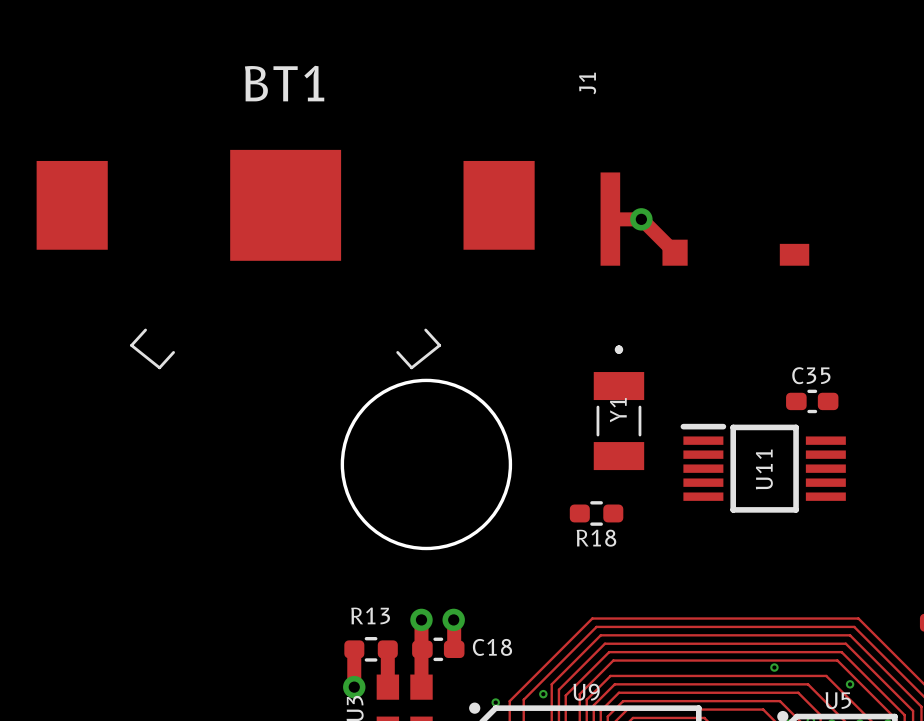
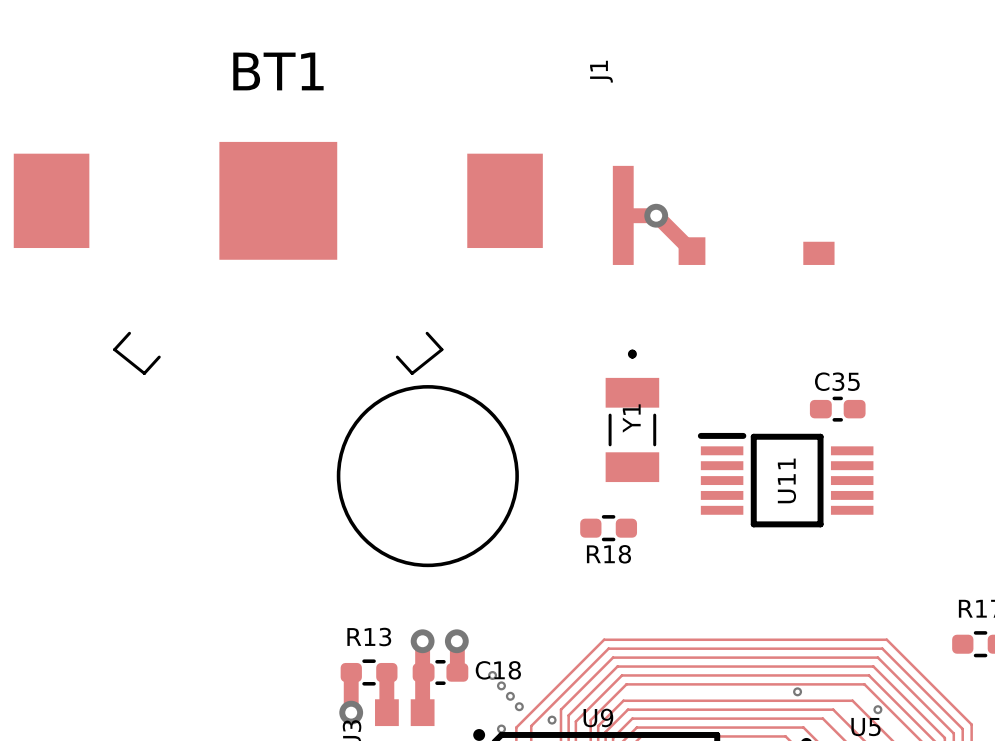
via: none -> (492, 675)
via: none -> (501, 685)
via: none -> (510, 696)
via: none -> (519, 706)

